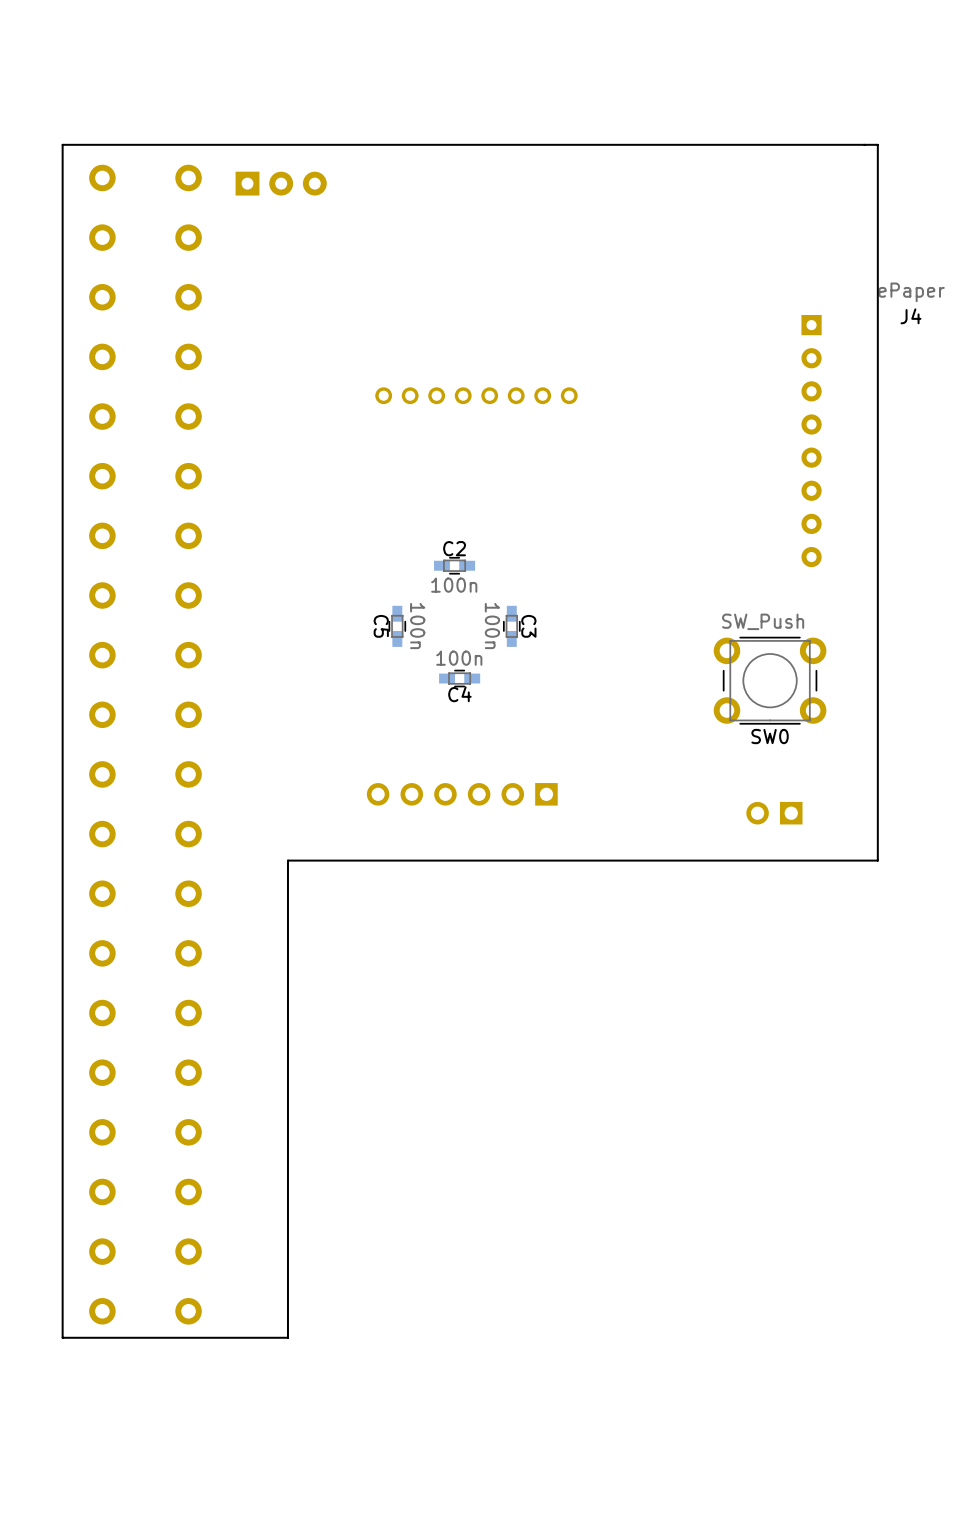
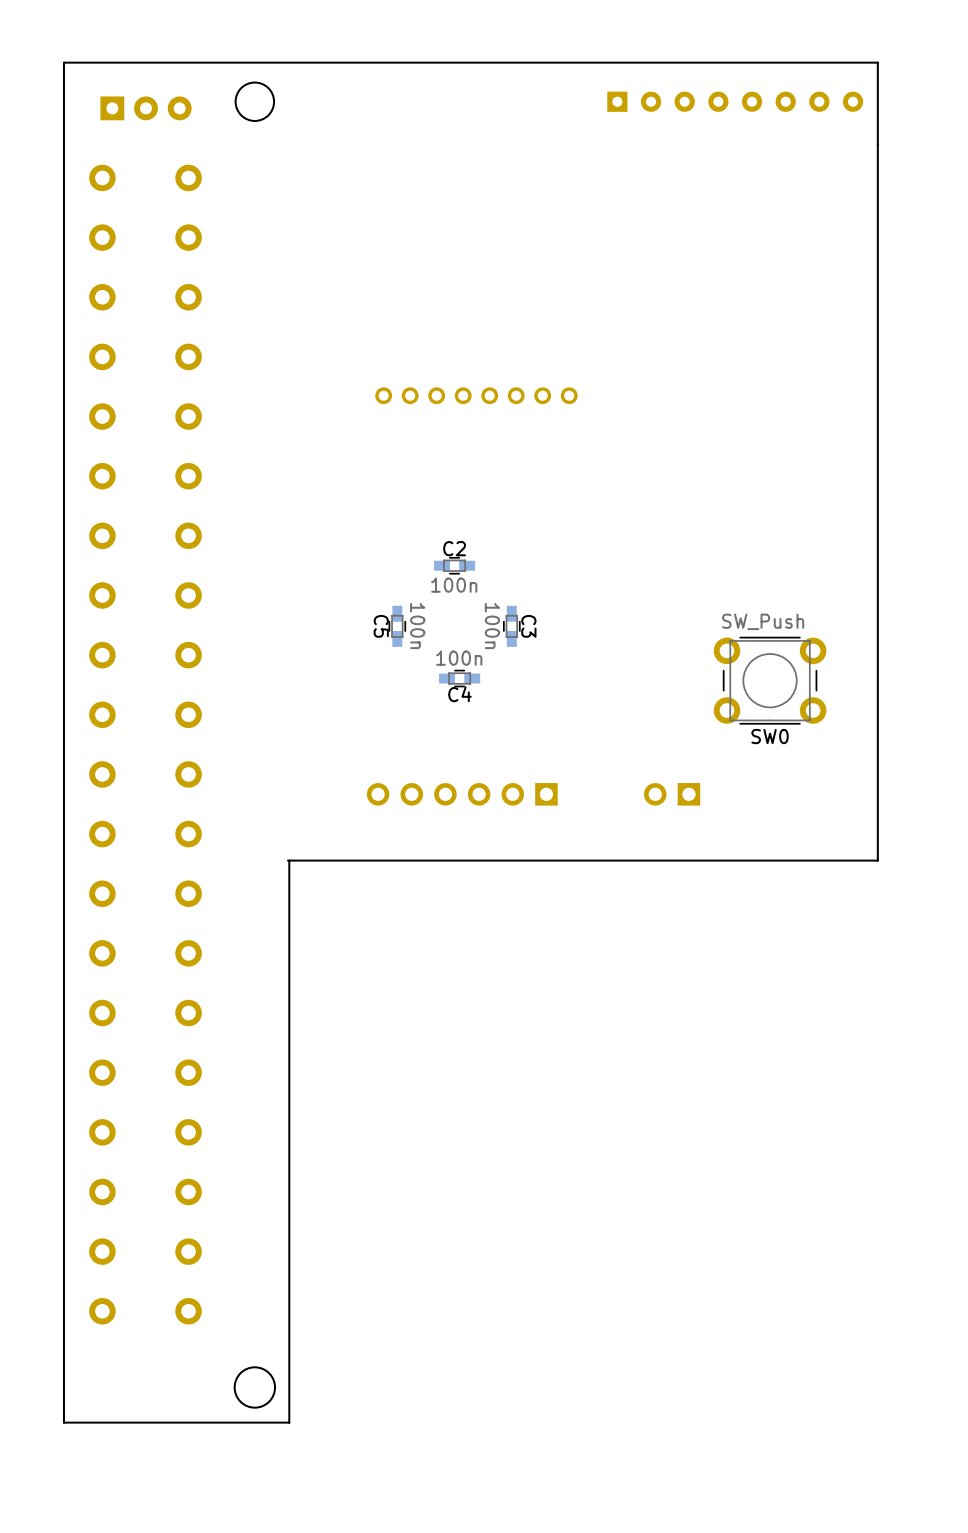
round board edge: none -> [234, 81, 276, 122]
part: none -> (735, 101)
board edge: (877, 144) (62, 144) (62, 1337) (287, 1337) (287, 860) -> (877, 144) (877, 62) (63, 62) (63, 1422) (289, 1422) (289, 860)
part position: (281, 183) -> (146, 108)
J4: ePaper (811, 441) -> none
part position: (774, 813) -> (672, 794)
round board edge: none -> [233, 1366, 277, 1409]

